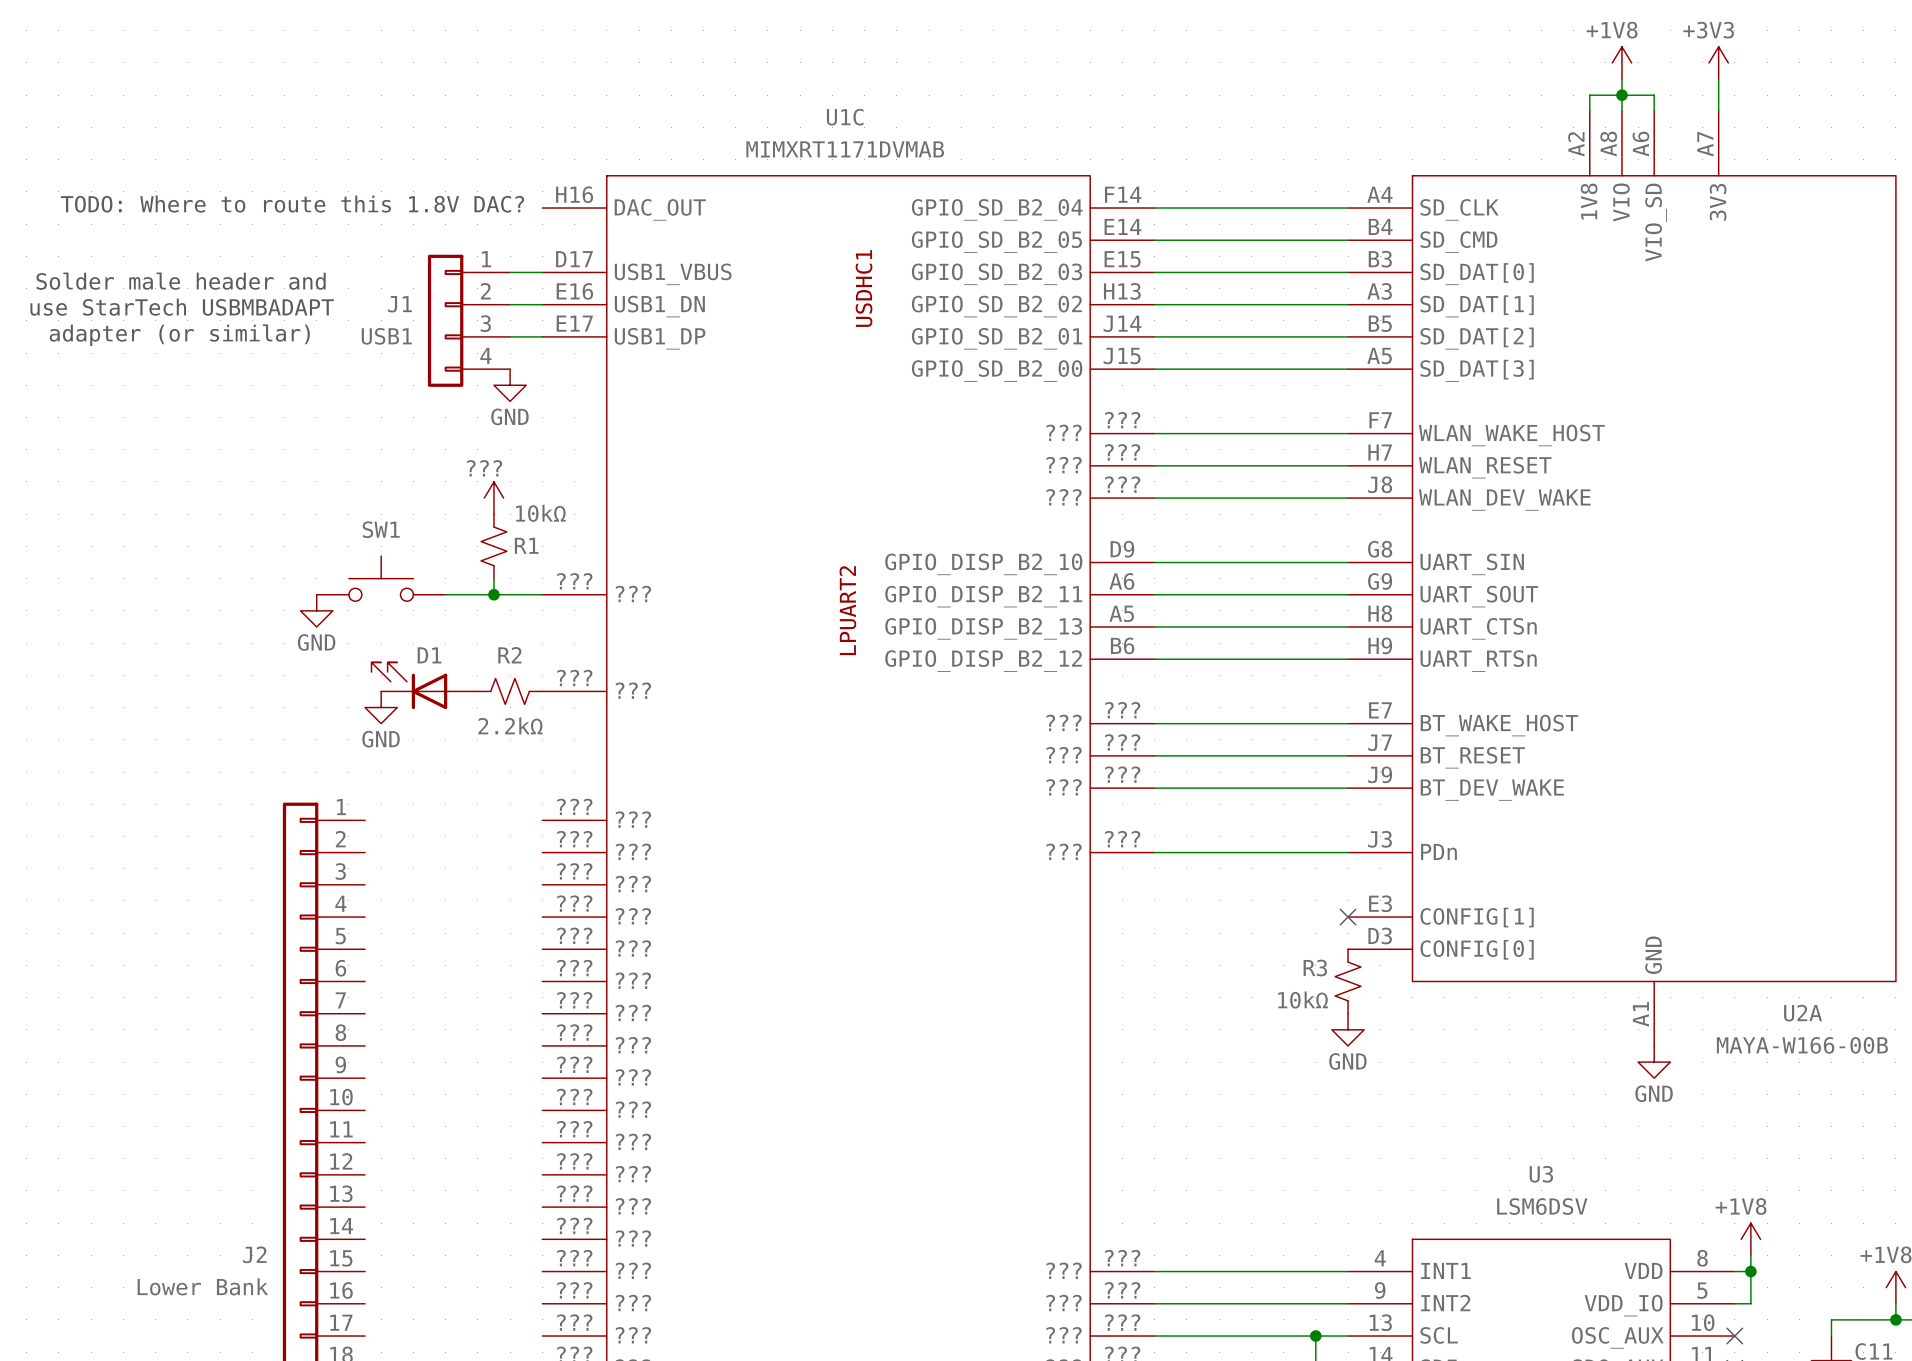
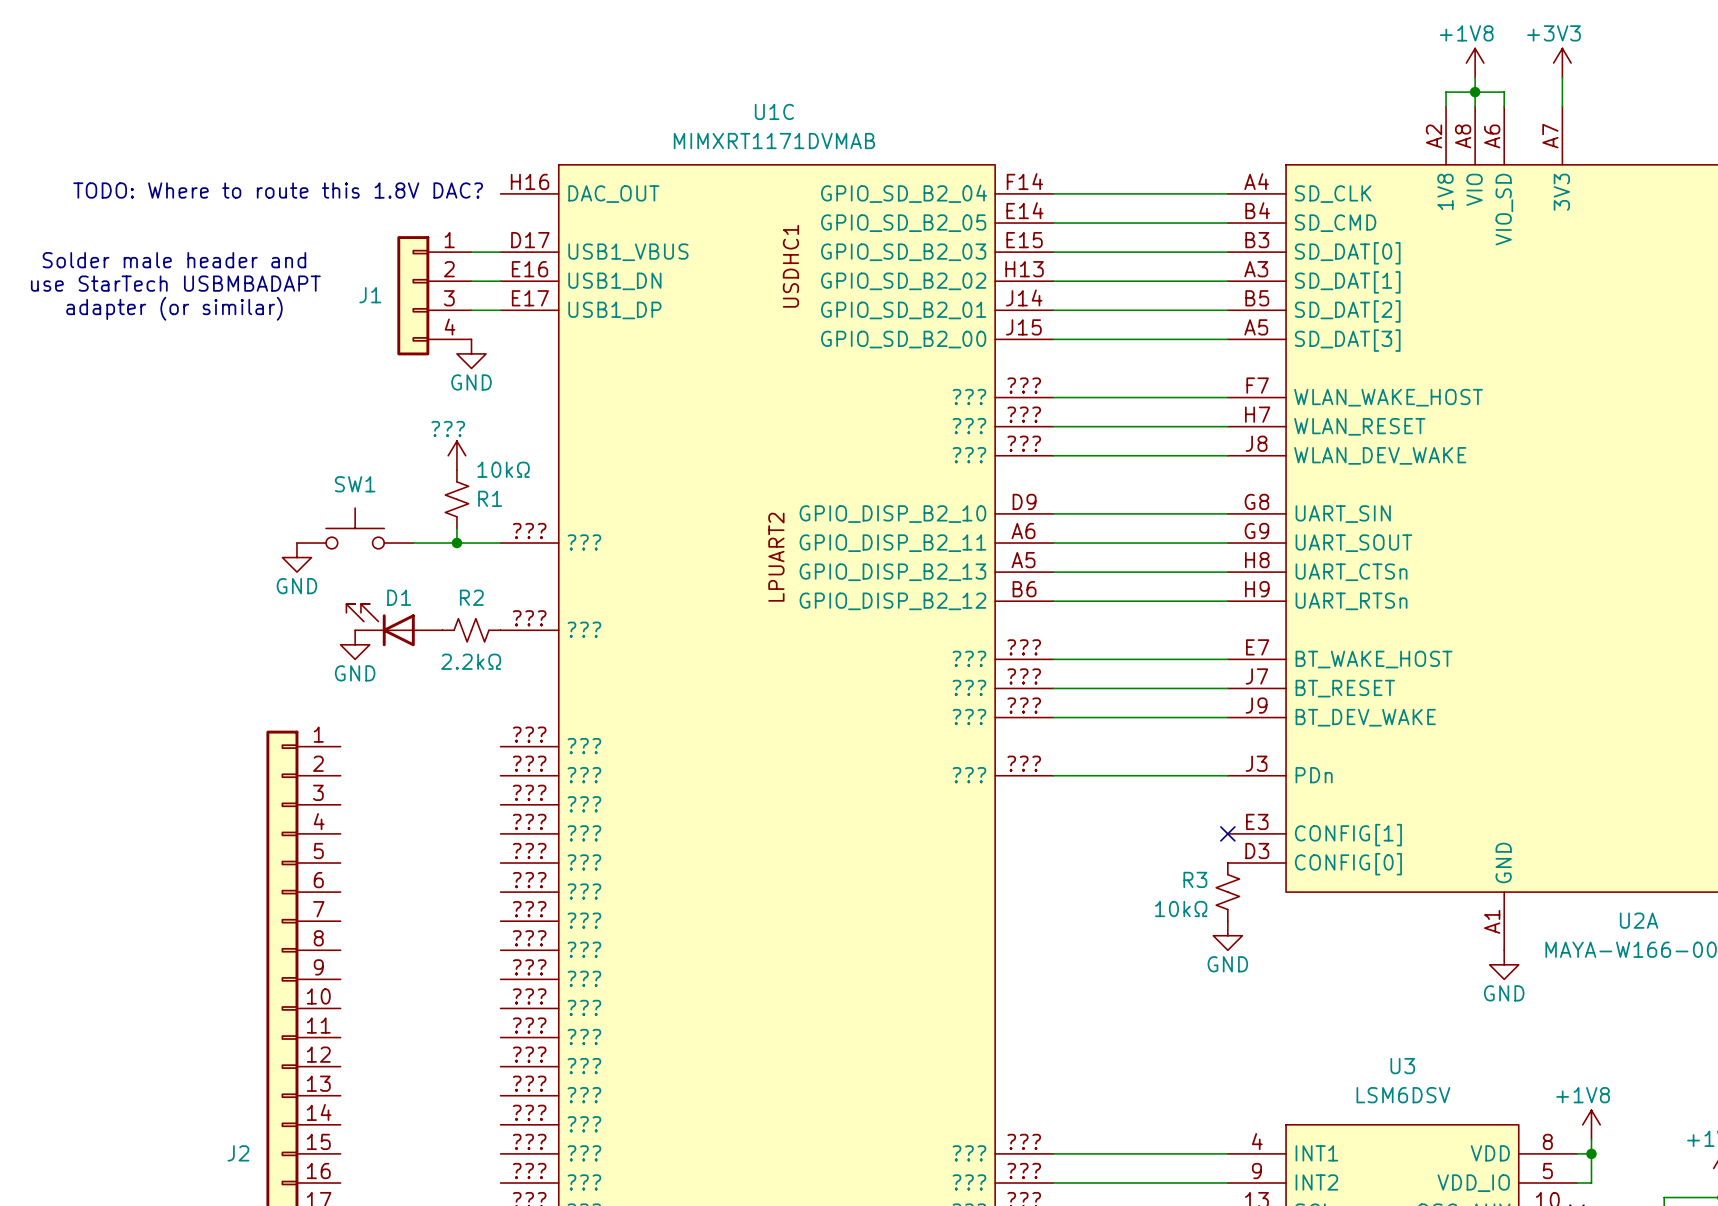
J1 name position: J1 (399, 304) -> J1 (370, 295)
J1 value: USB1 (386, 336) -> none
J2 name position: J2 (254, 1254) -> J2 (238, 1153)
J2 value: Lower Bank (202, 1286) -> none

